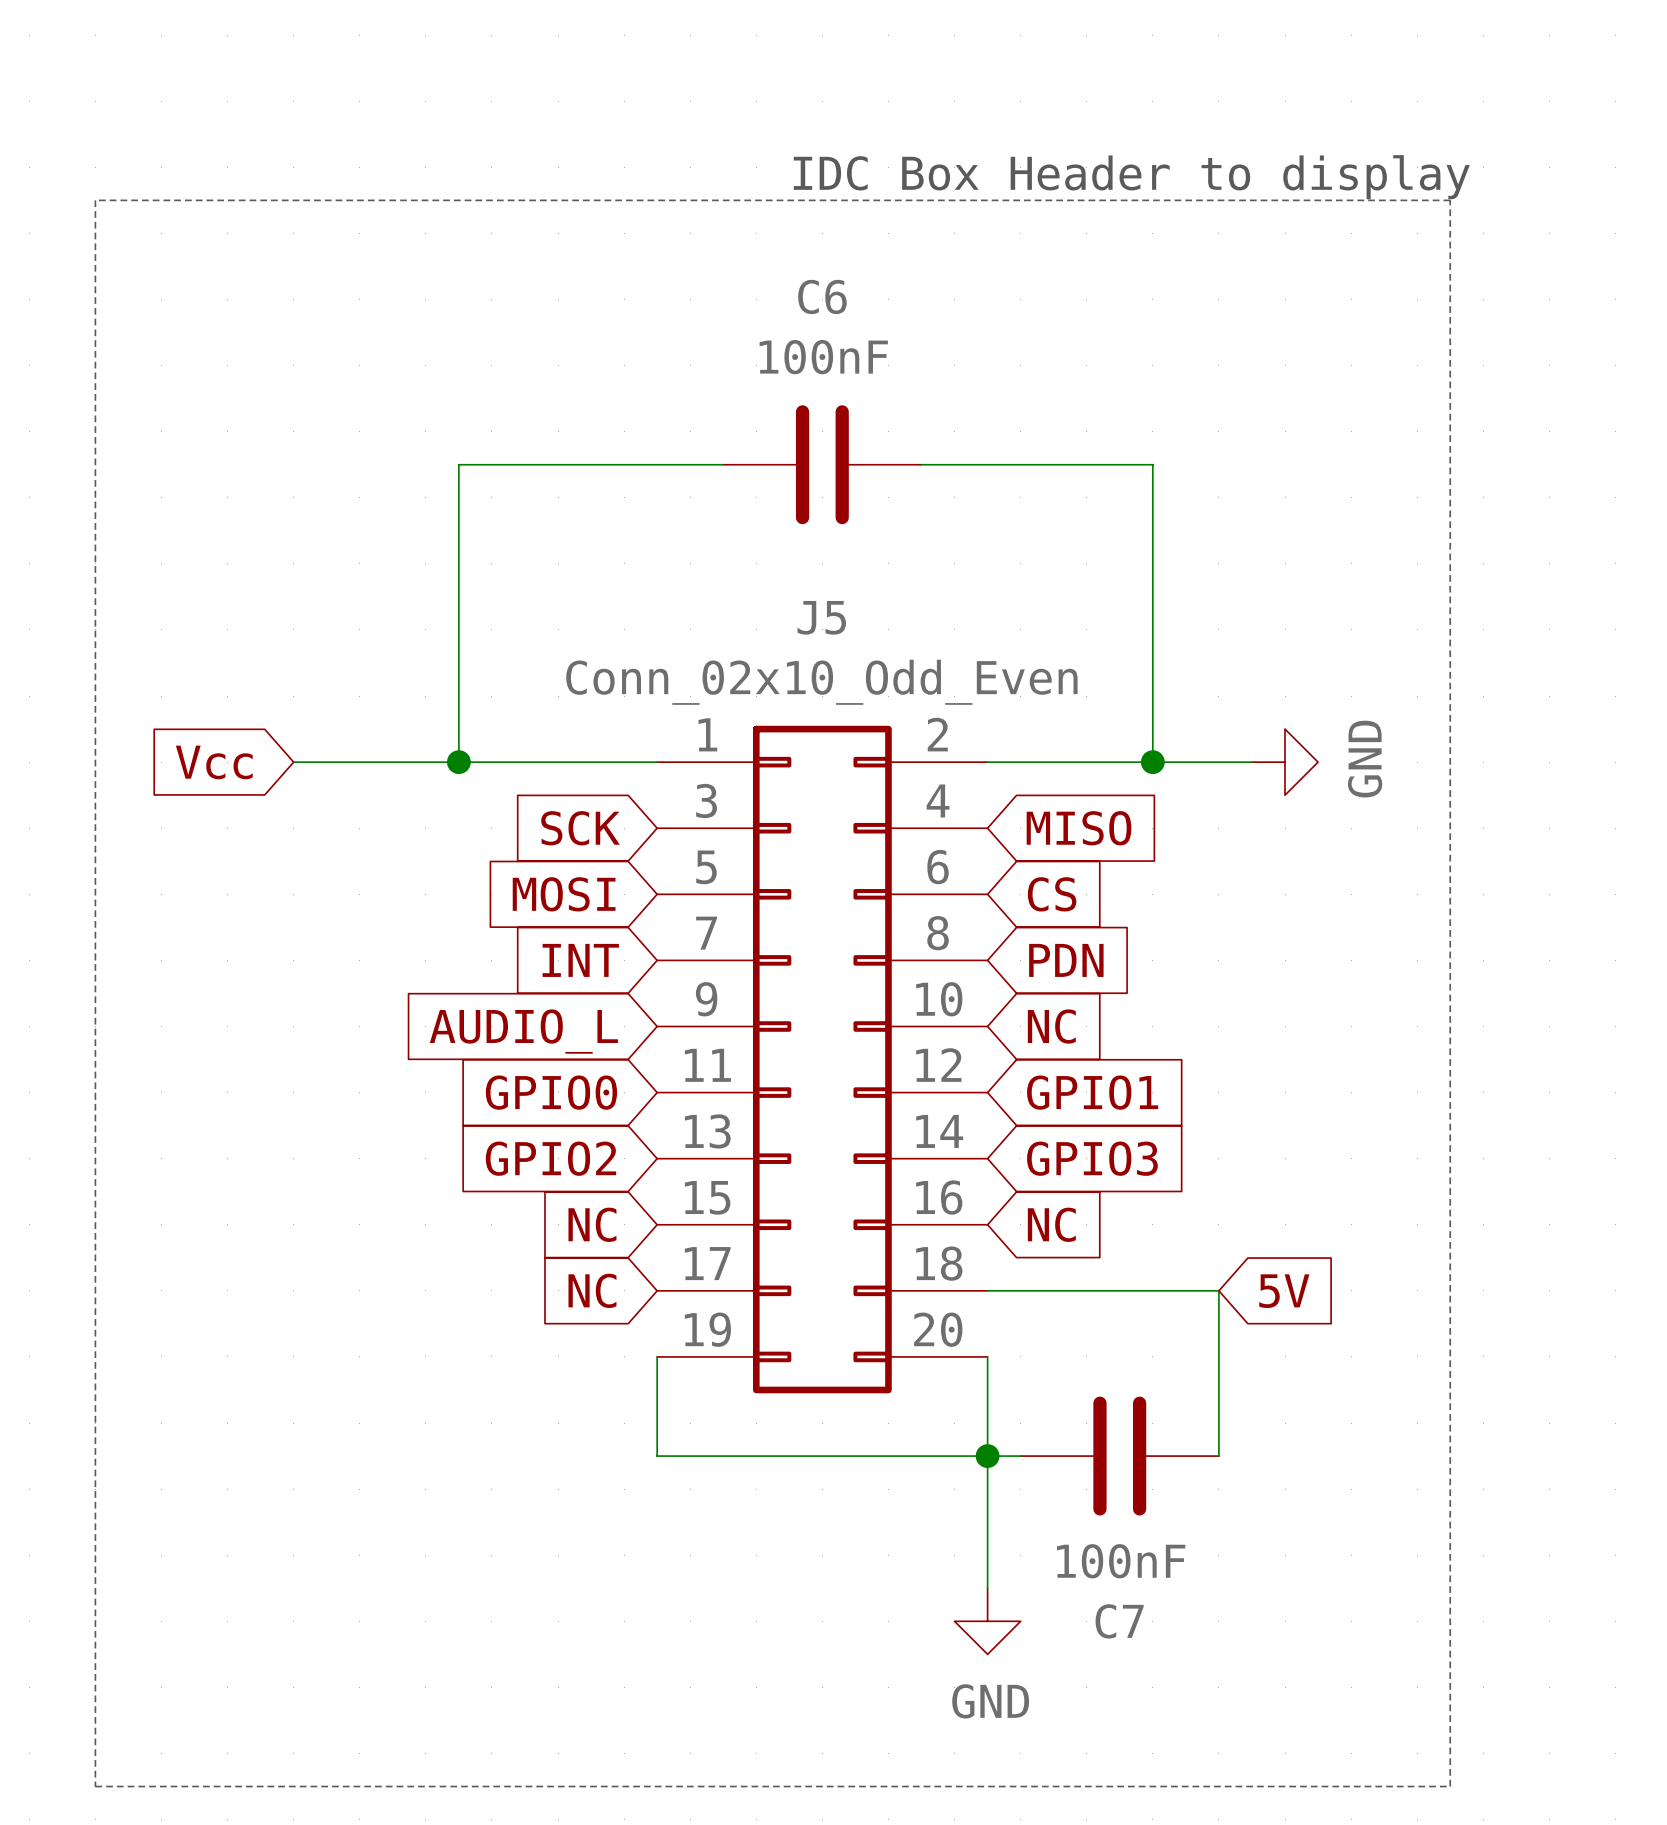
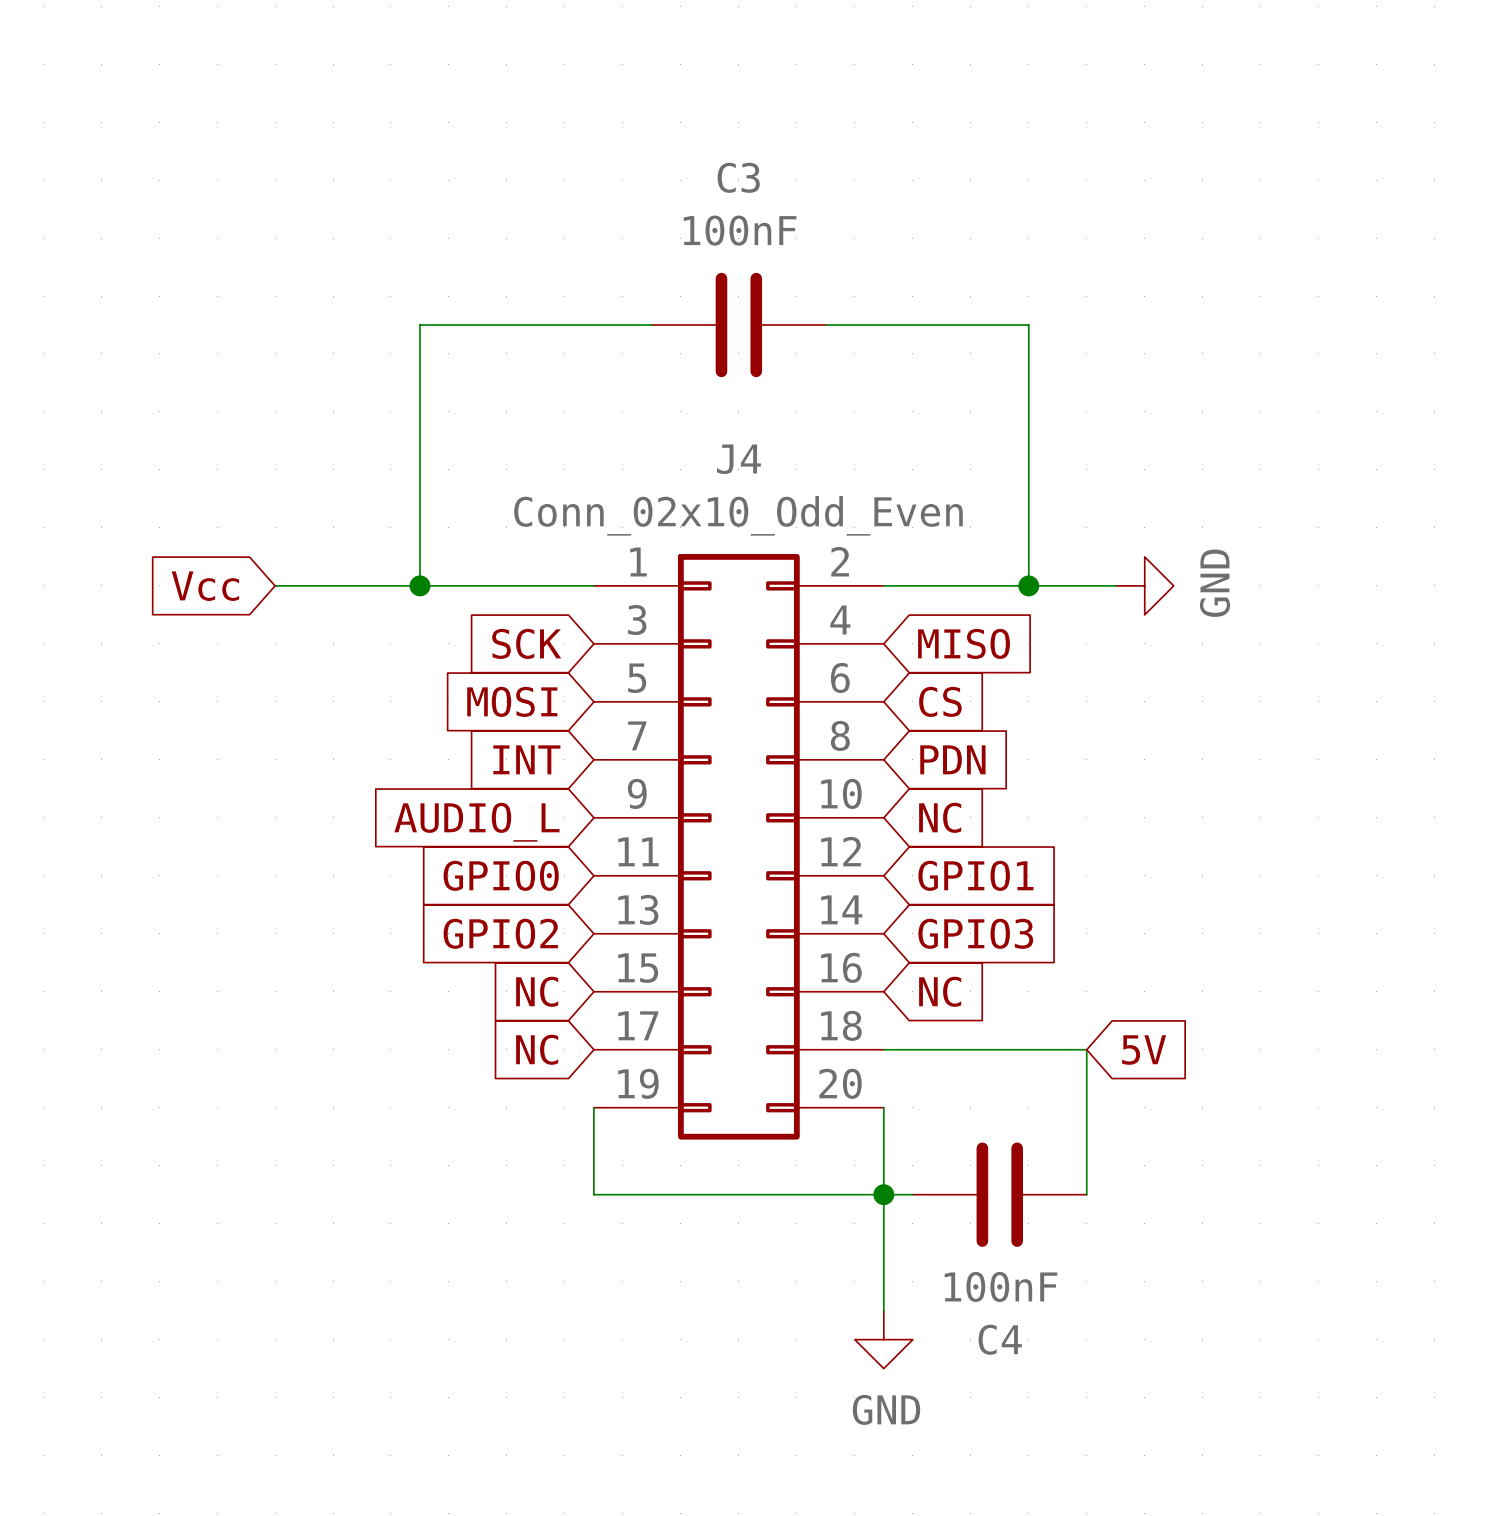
text: IDC Box Header to display (1131, 177) -> none
line: (95, 200) (1450, 200) (1450, 1786) (95, 1786) (95, 200) -> none
C6 name: C6 (822, 296) -> C3 (738, 177)
J5 name: J5 (821, 617) -> J4 (738, 459)
C7 name: C7 (1119, 1621) -> C4 (1000, 1339)

